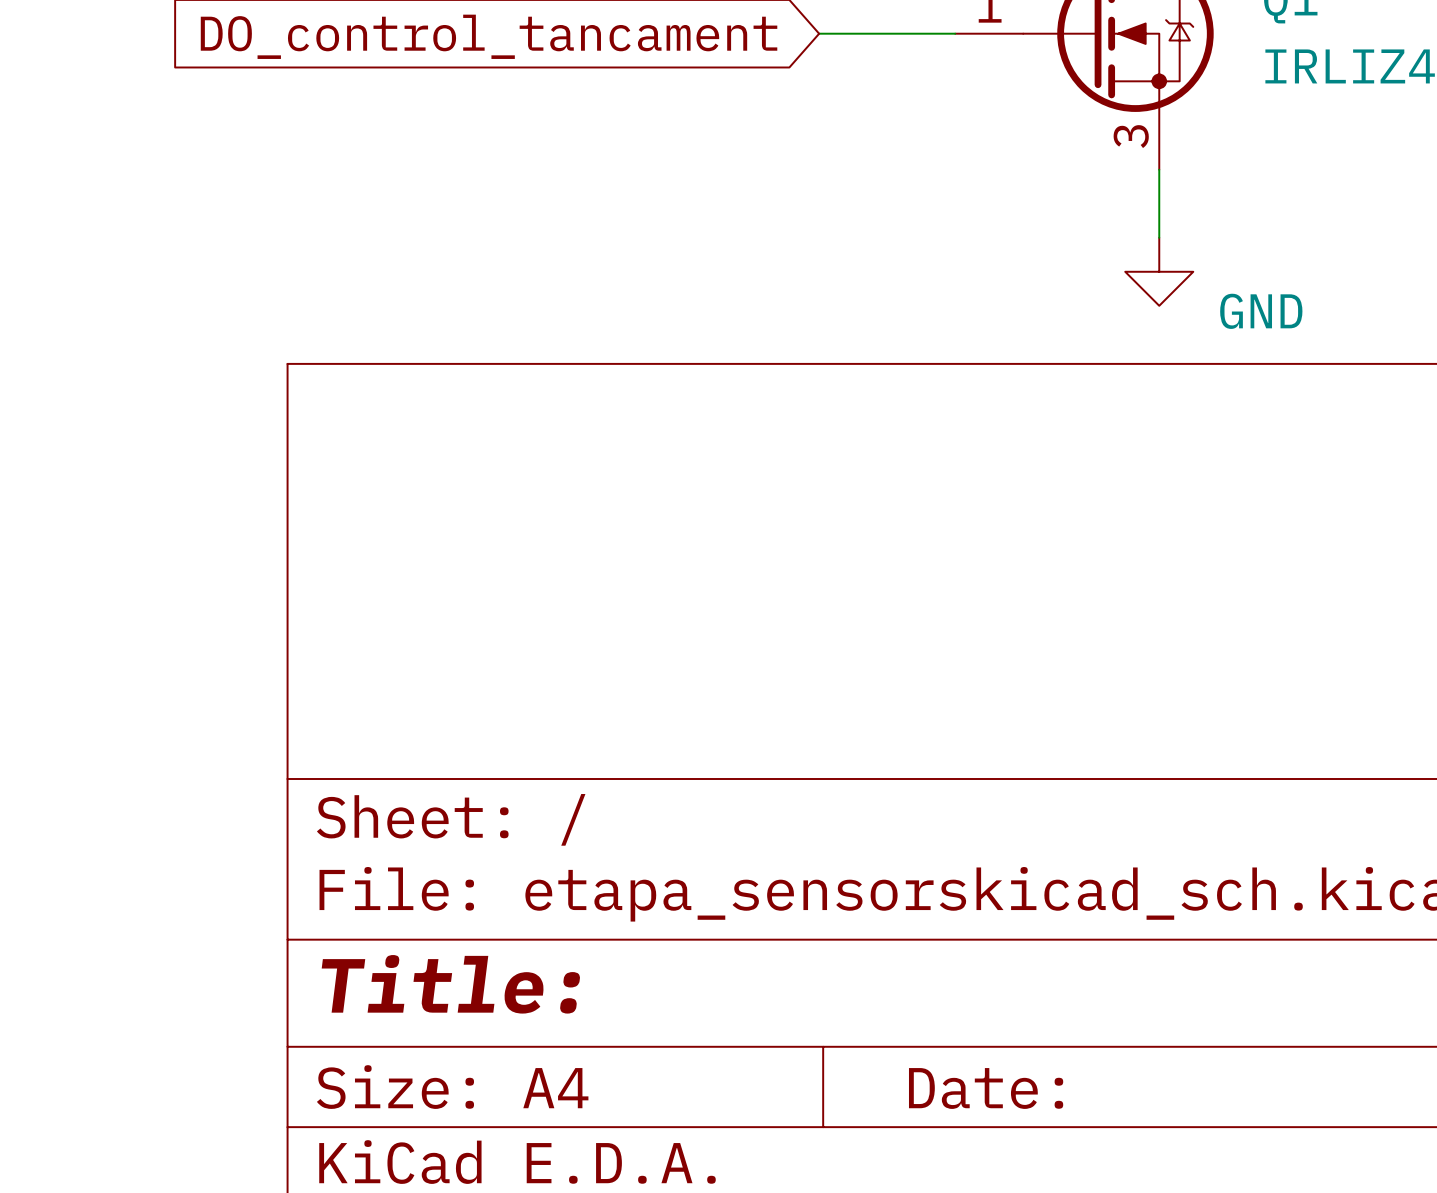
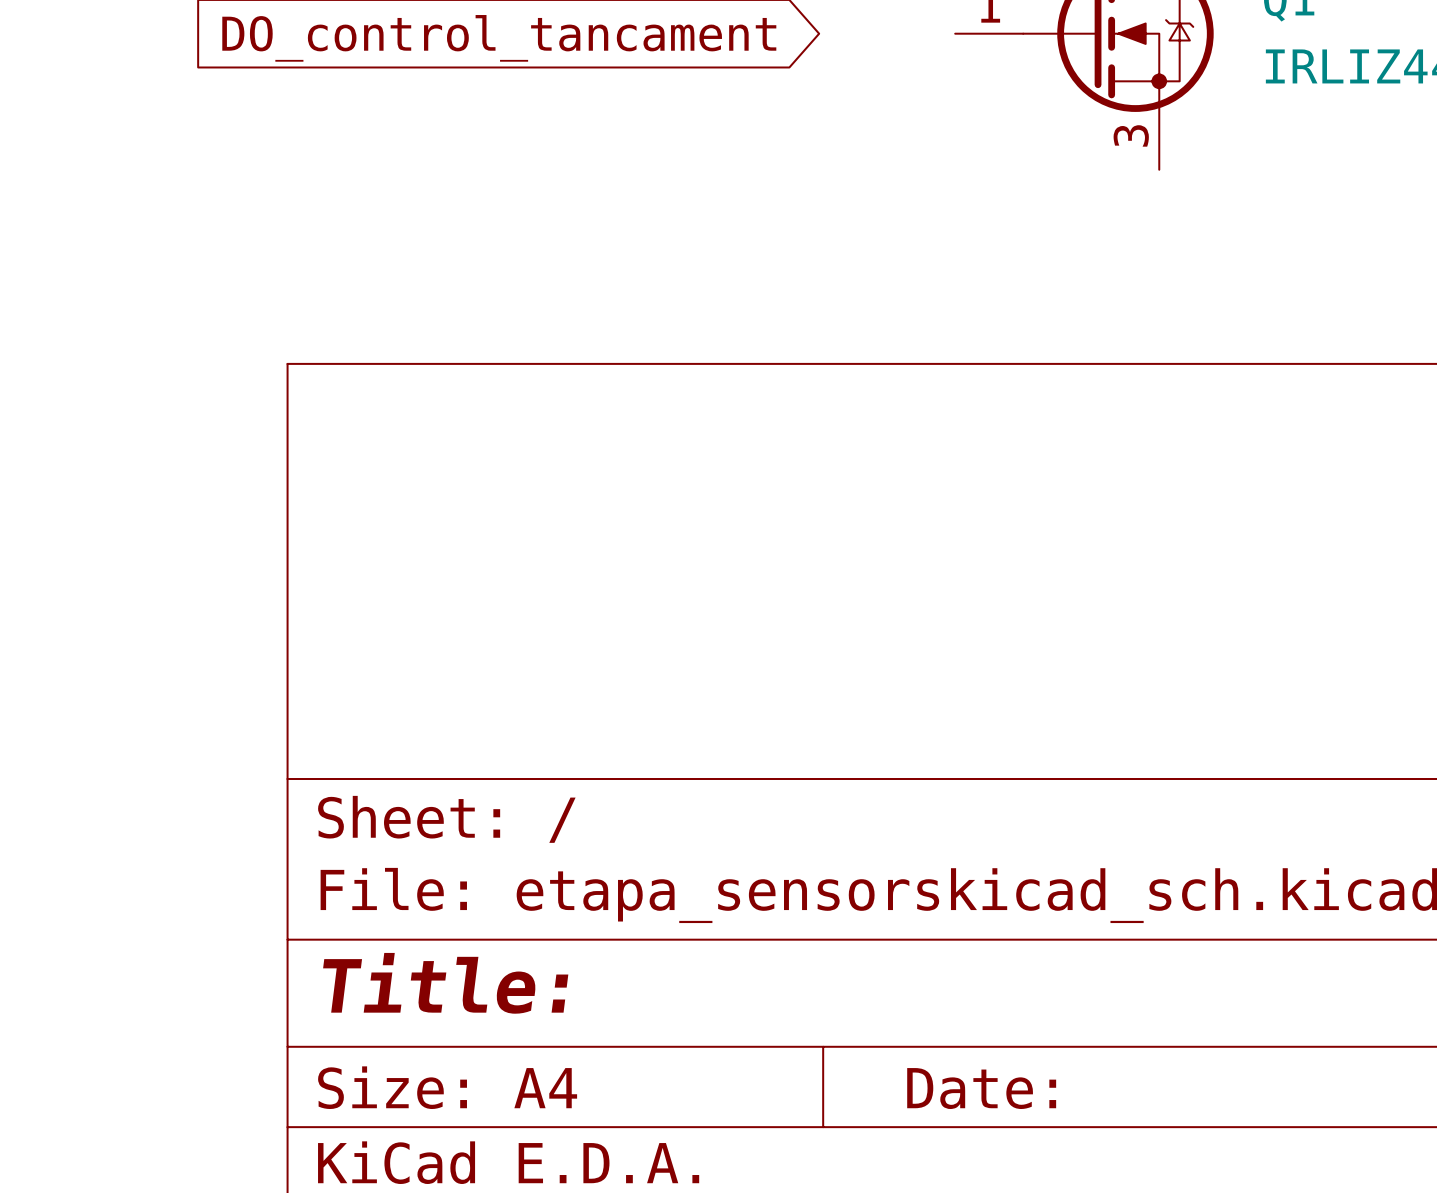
wire: (819, 33) (955, 33) -> none
wire: (1159, 169) (1159, 237) -> none
power symbol: GND (1159, 271) -> none

